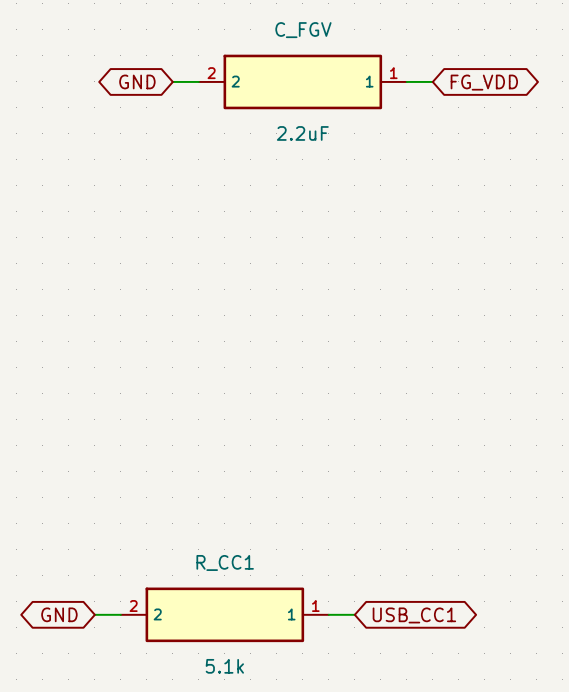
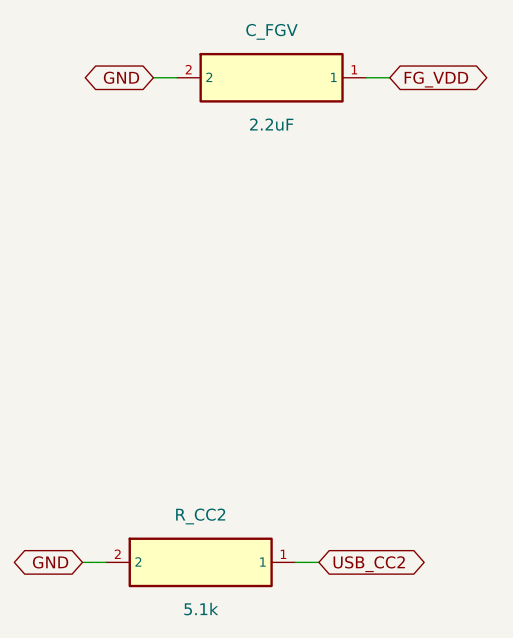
R_CC1 name: R_CC1 (225, 562) -> R_CC2 (200, 516)
global label: USB_CC1 (414, 615) -> USB_CC2 (369, 564)

